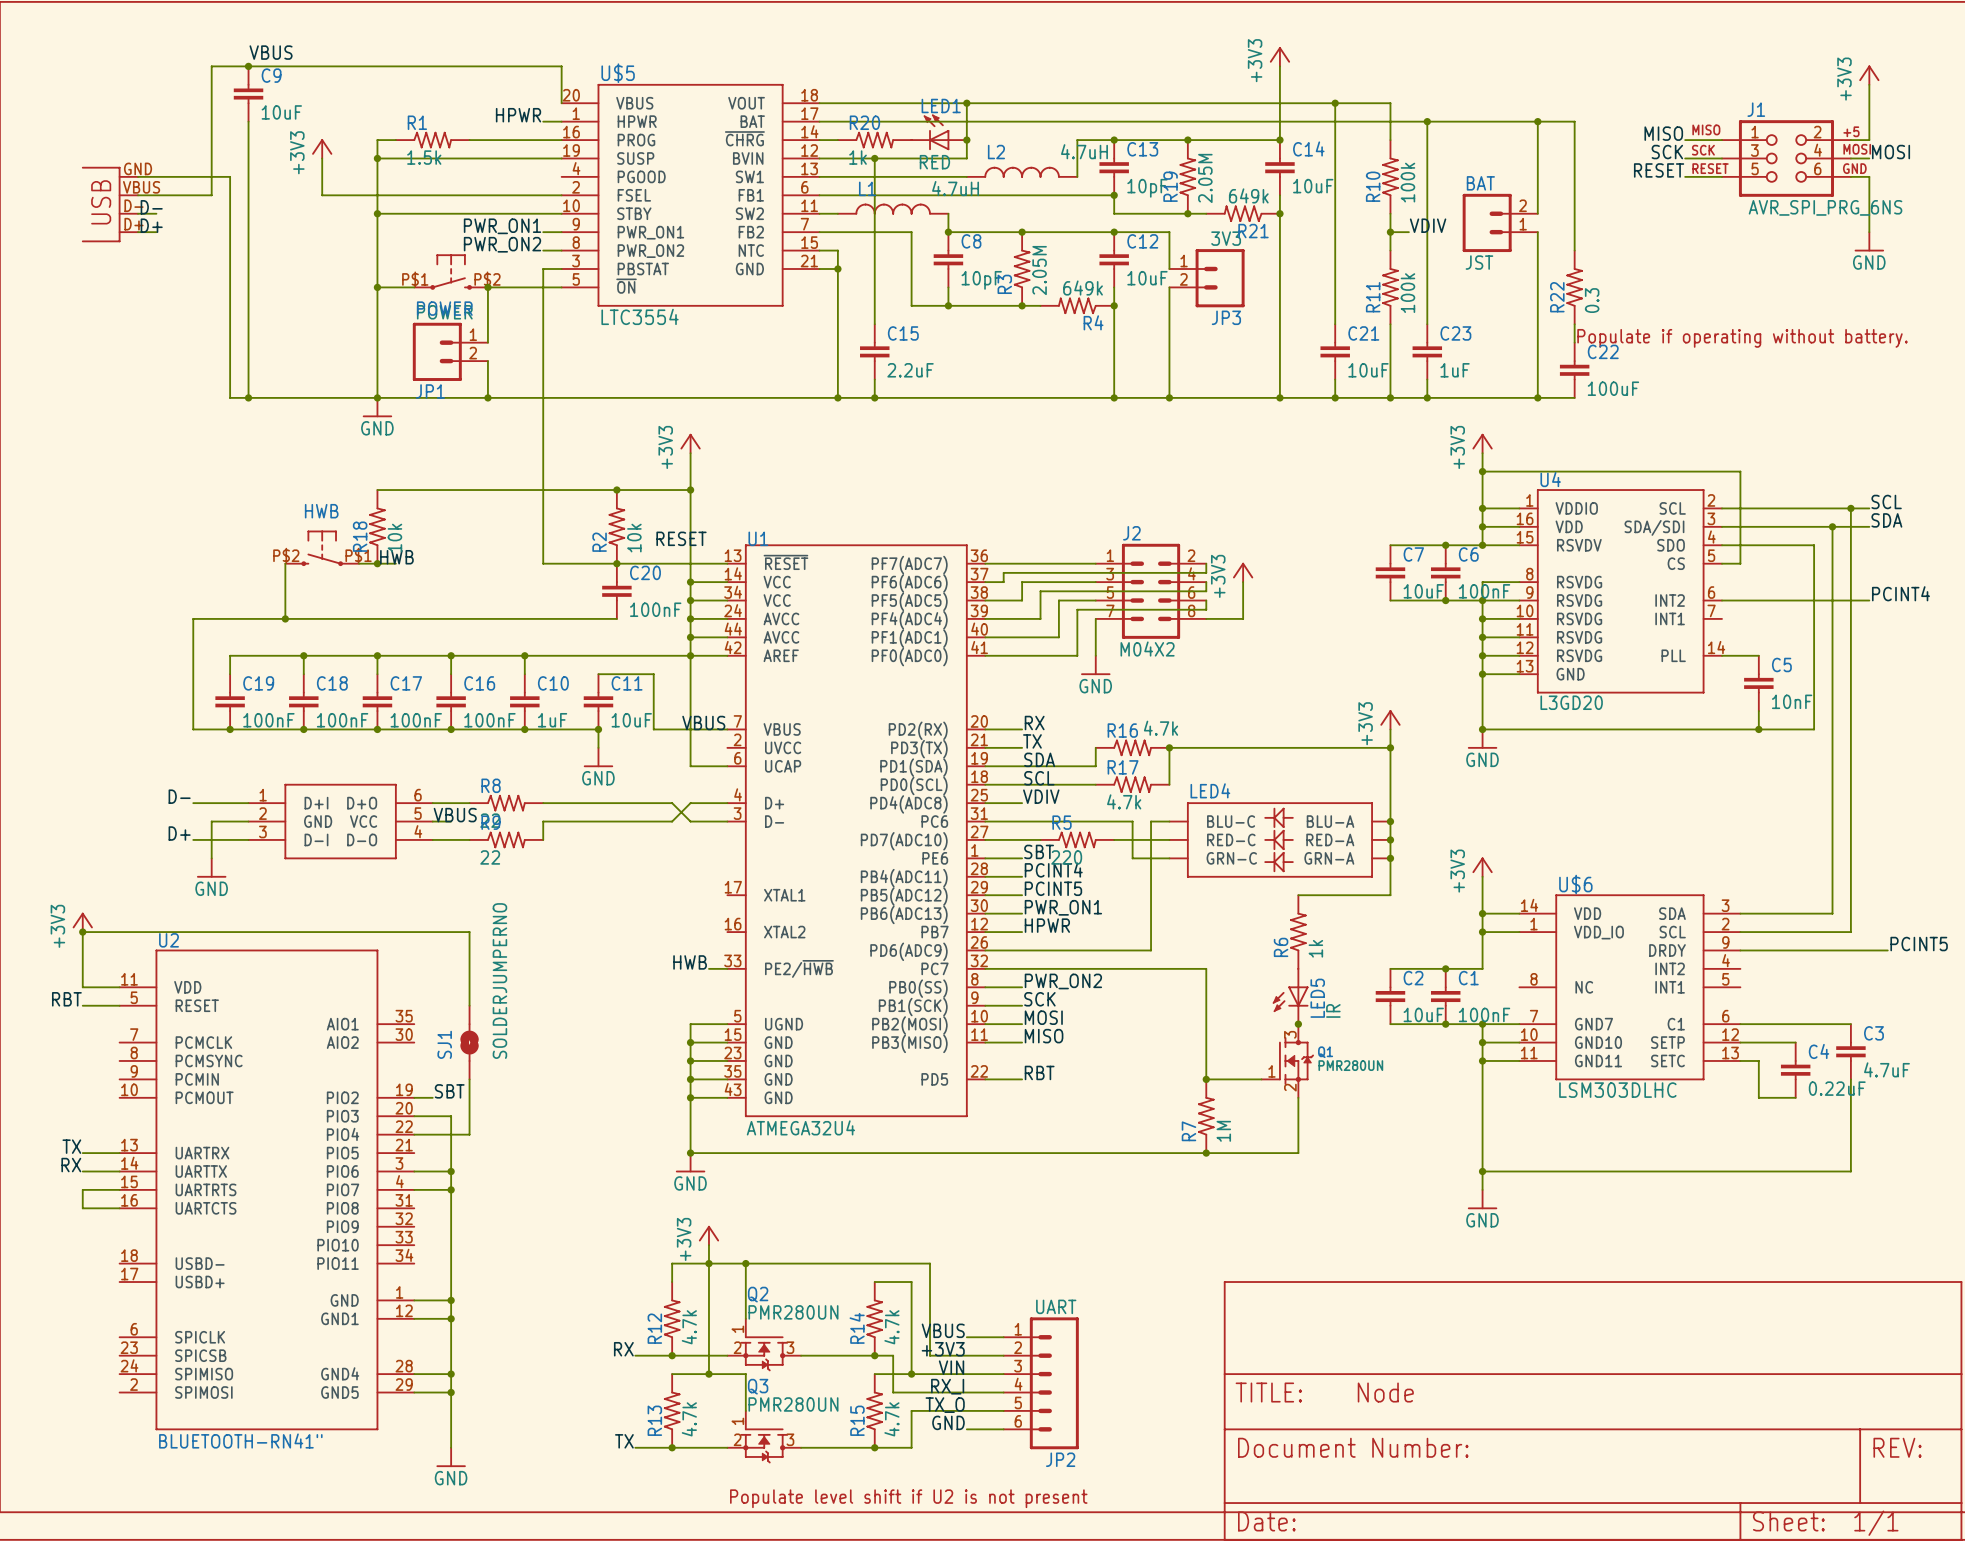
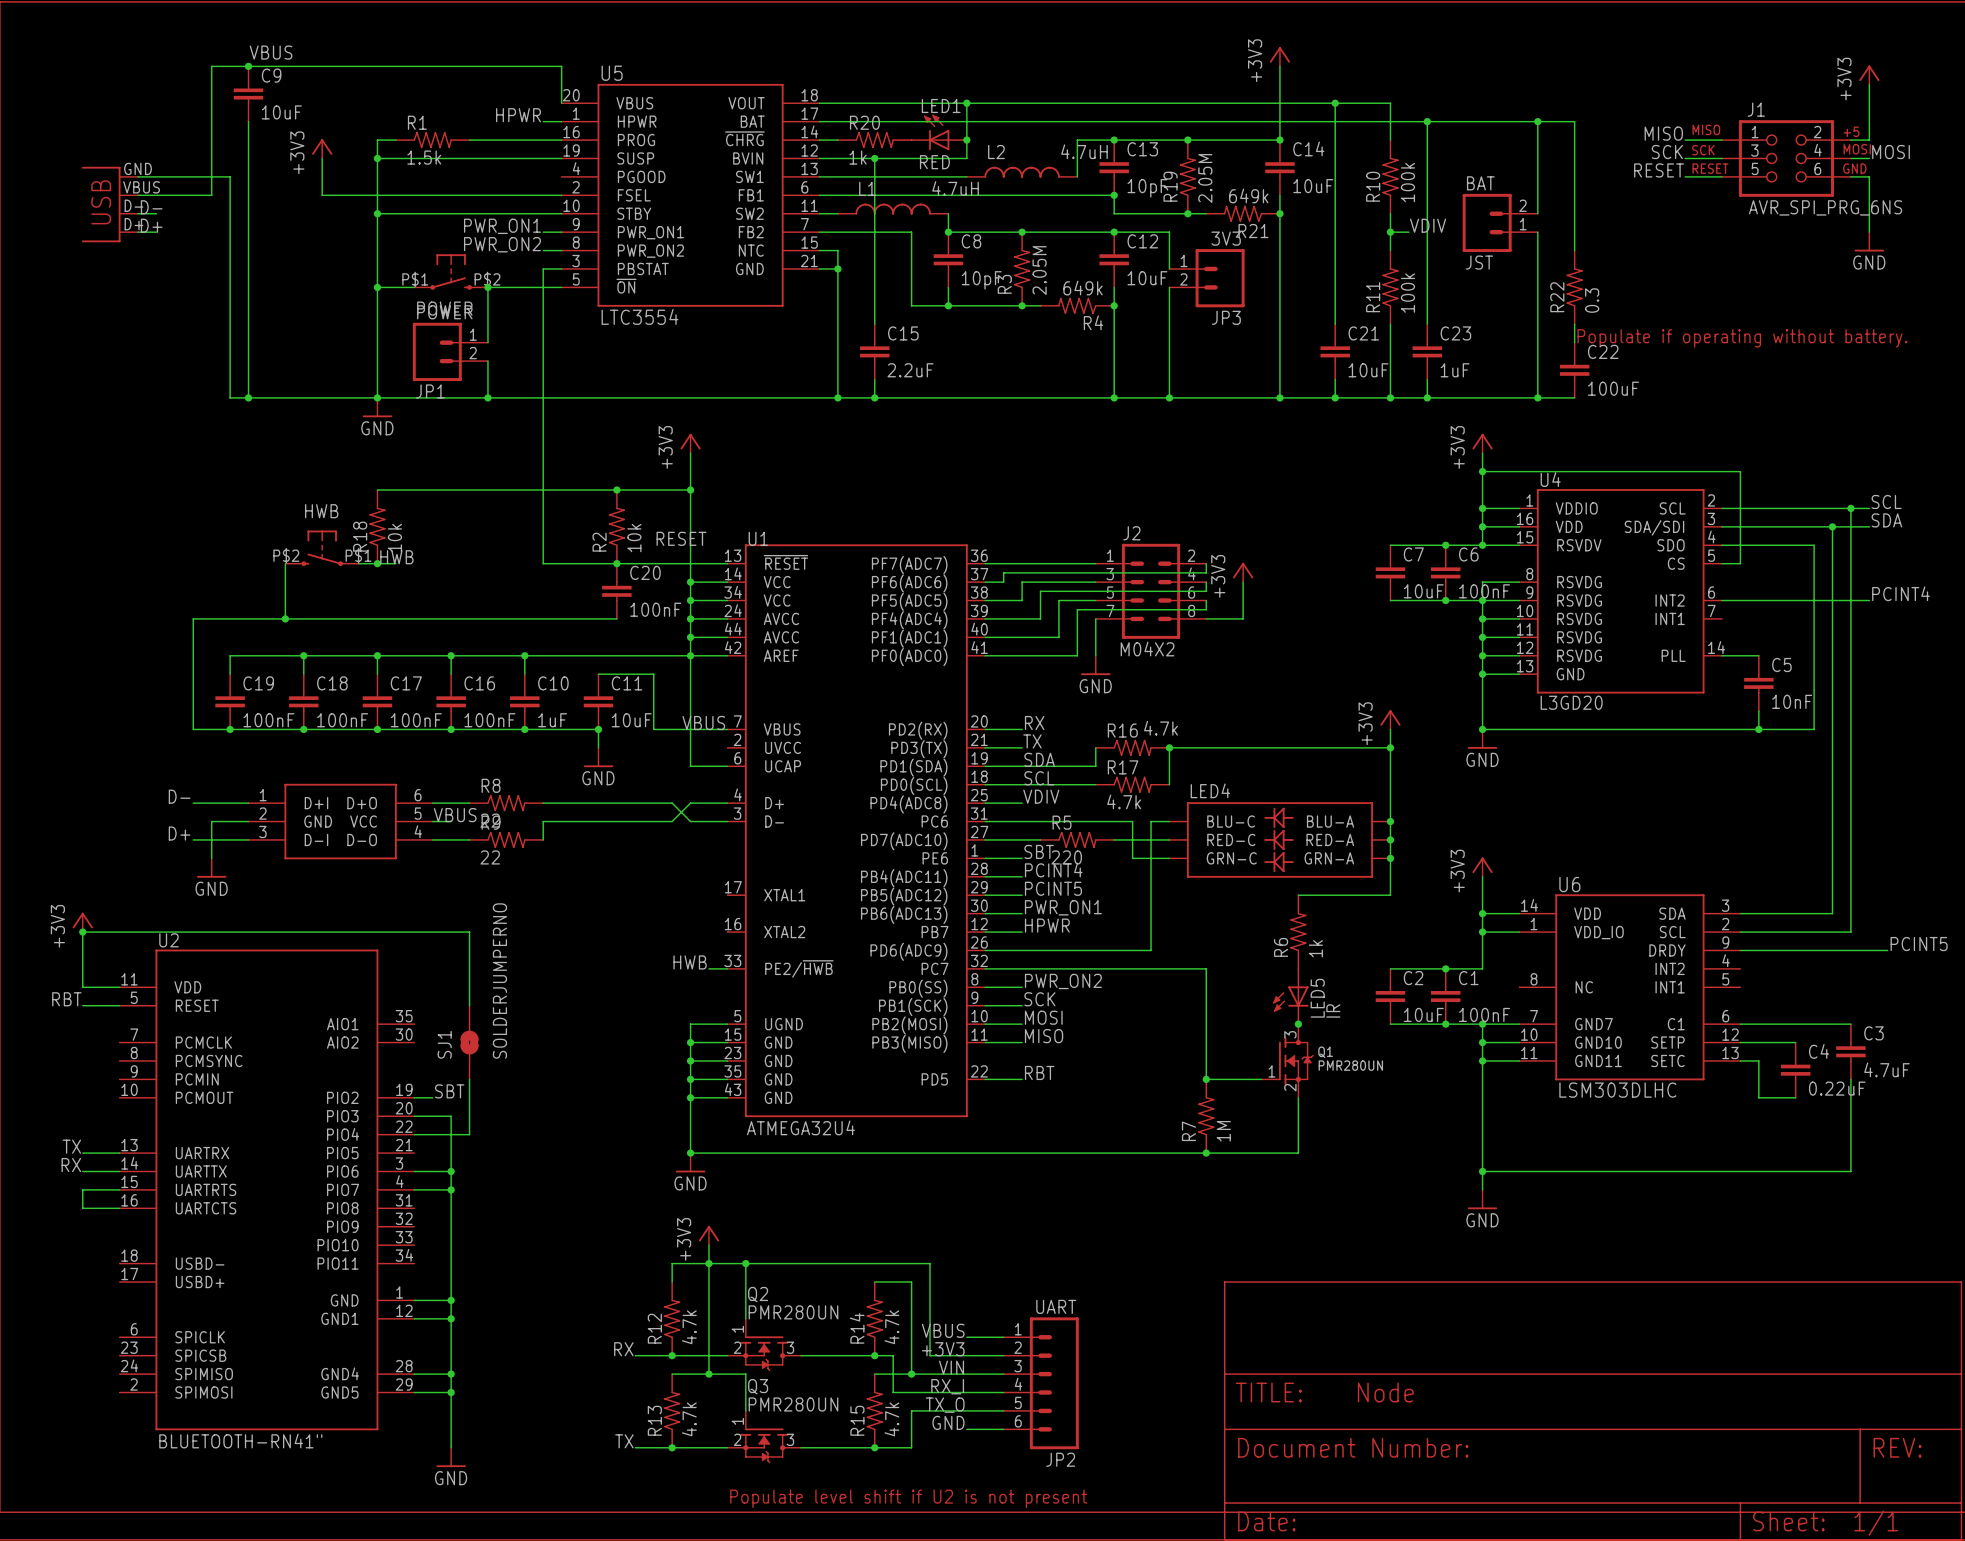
U$5 name: U$5 (618, 73) -> U5 (612, 73)
U$6 name: U$6 (1575, 884) -> U6 (1569, 884)

